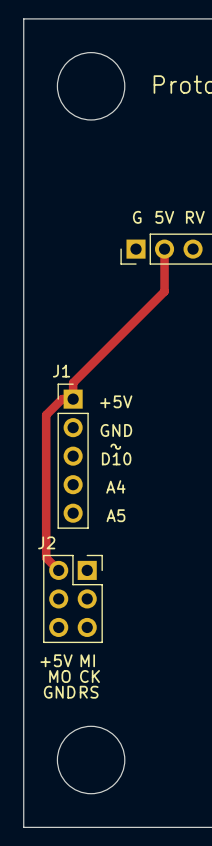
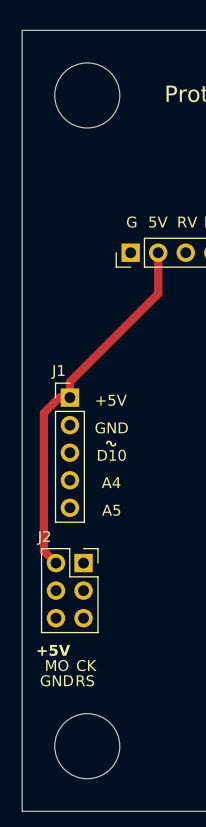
text: MI (87, 660) -> none

